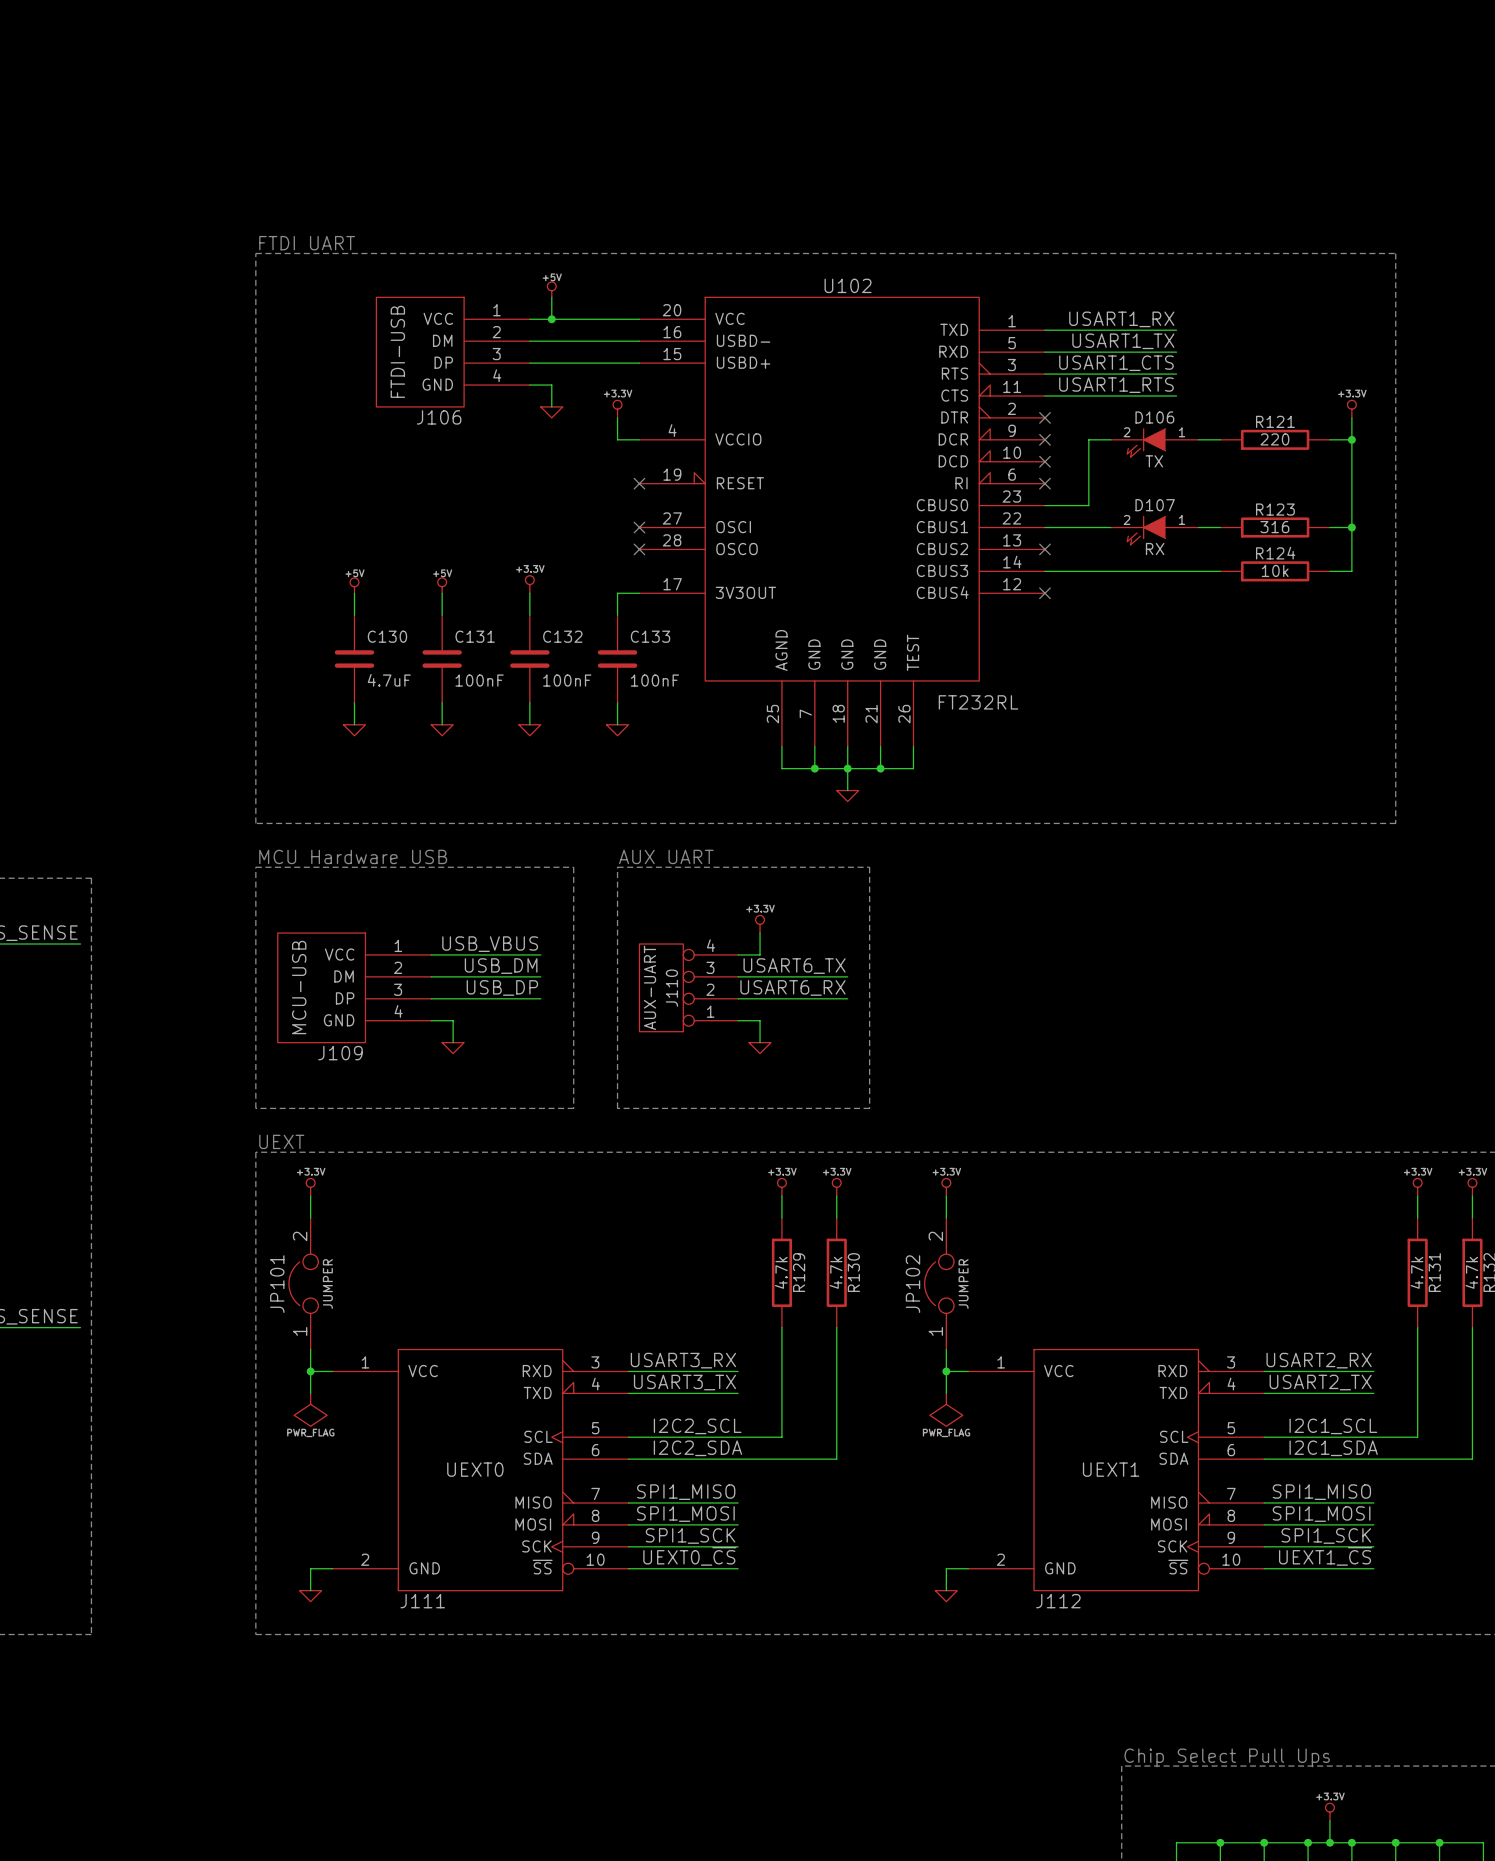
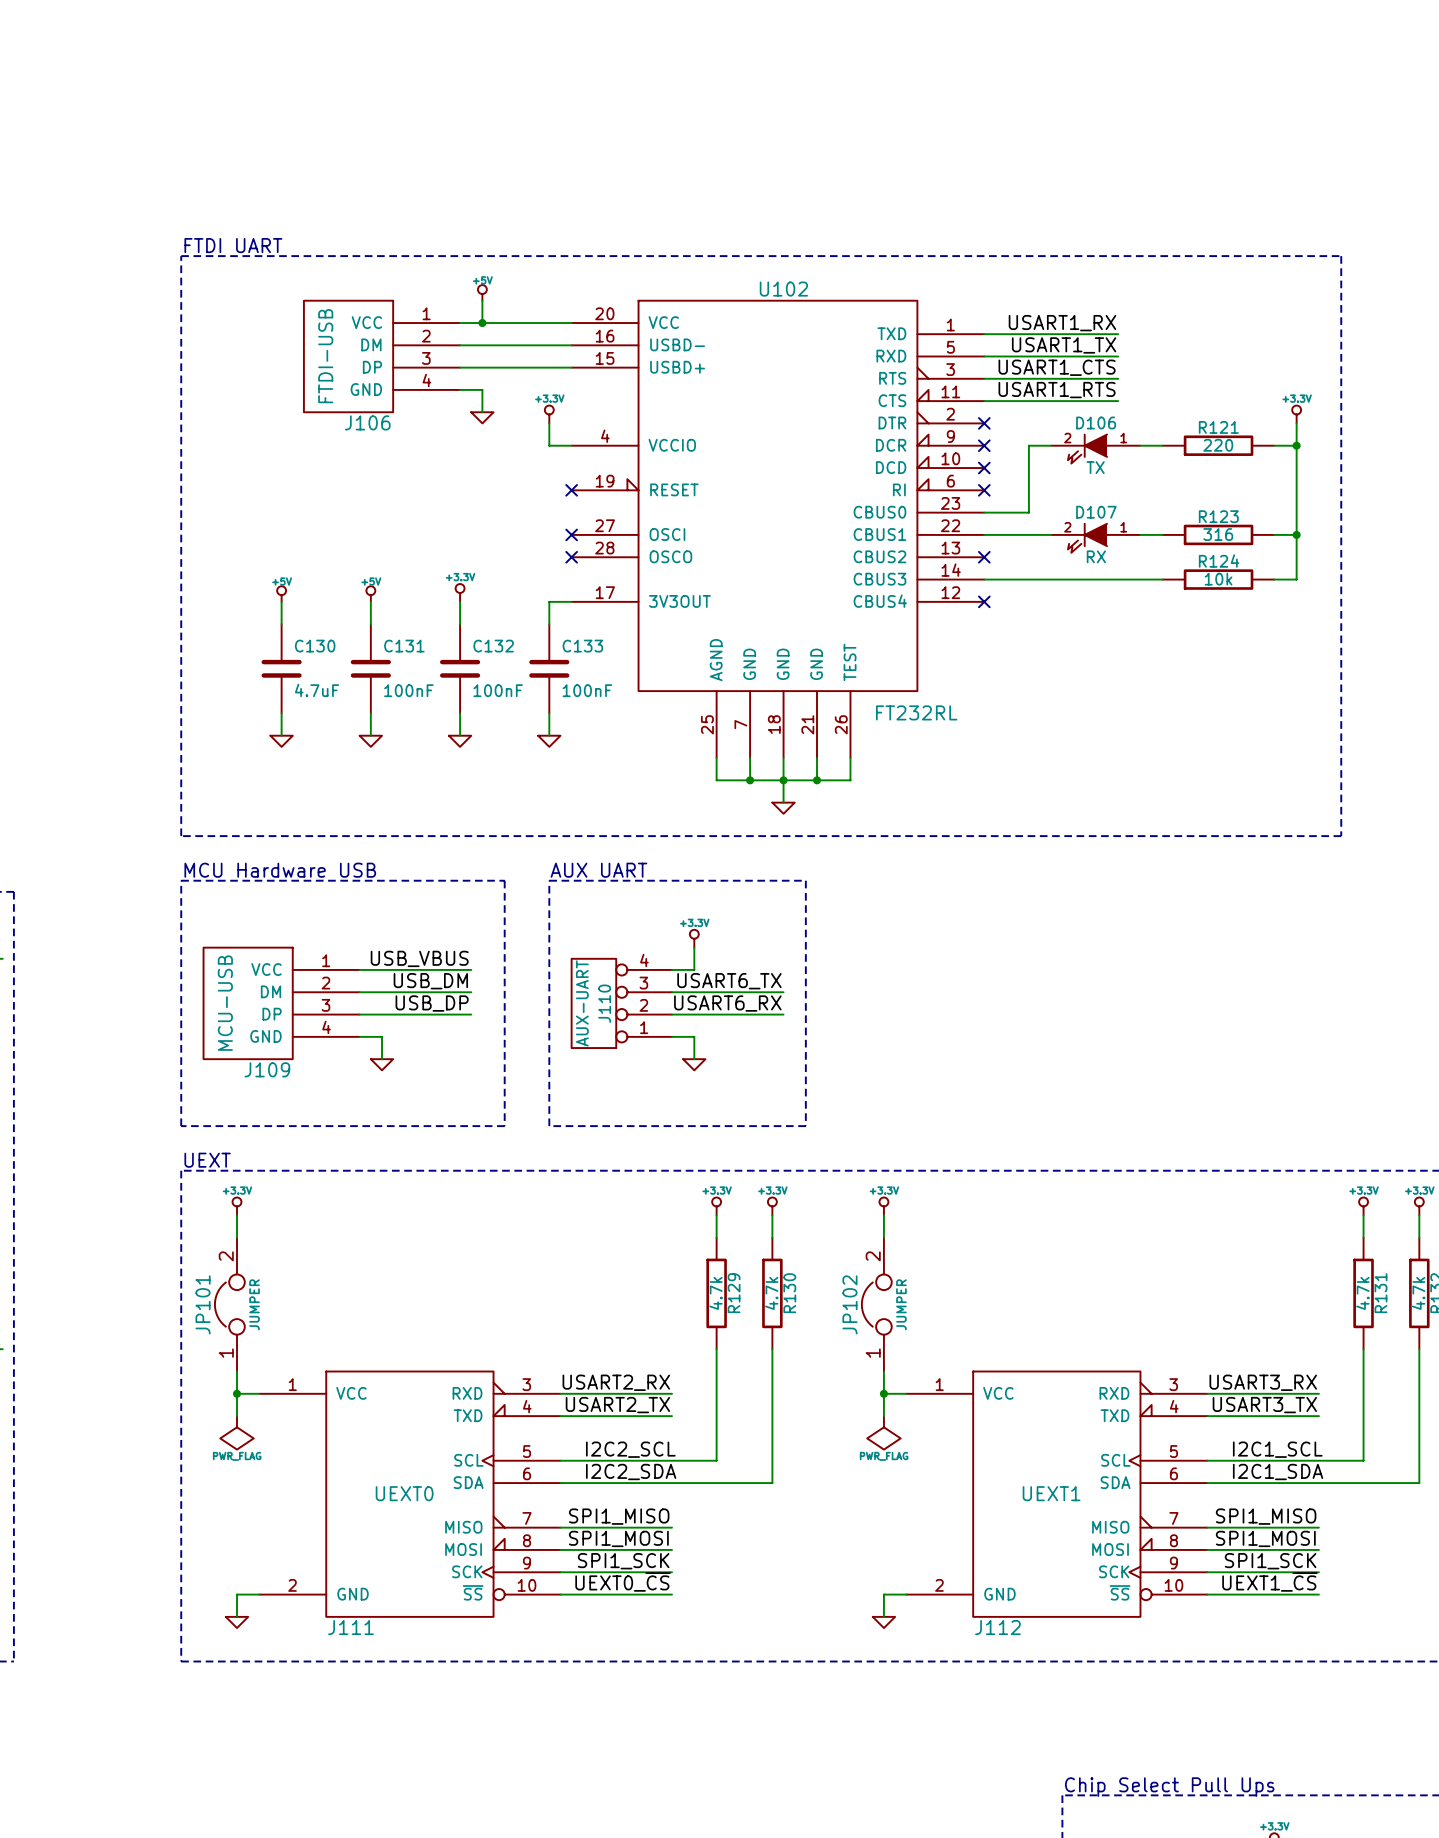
label: USART3_RX (683, 1360) -> USART2_RX (616, 1382)
label: USART2_RX (1319, 1360) -> USART3_RX (1263, 1382)
label: USART3_TX (684, 1382) -> USART2_TX (617, 1405)
label: USART2_TX (1320, 1382) -> USART3_TX (1264, 1405)

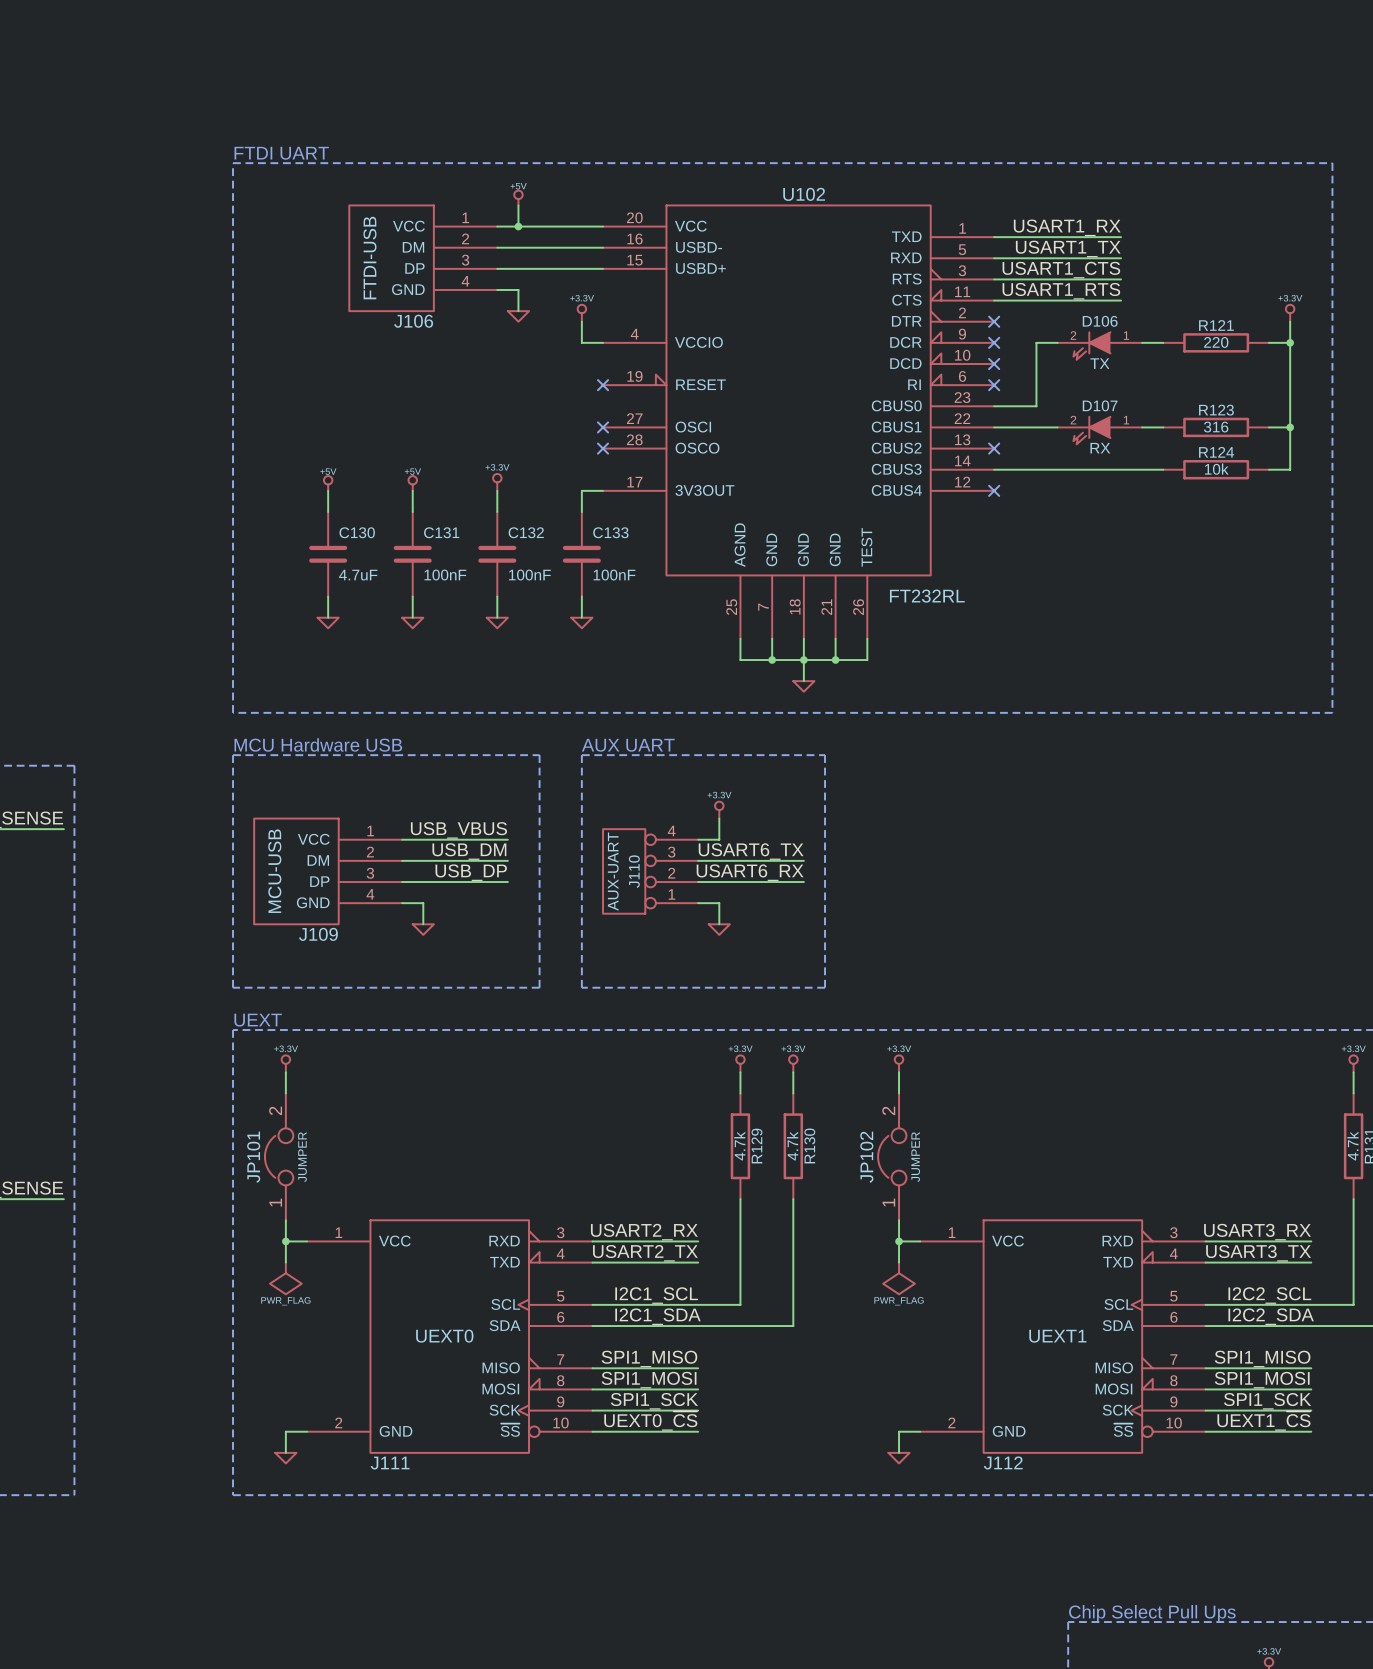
label: I2C2_SCL (630, 1449) -> I2C1_SCL (656, 1295)
label: I2C1_SCL (1277, 1449) -> I2C2_SCL (1269, 1295)
label: I2C2_SDA (631, 1472) -> I2C1_SDA (657, 1316)
label: I2C1_SDA (1278, 1472) -> I2C2_SDA (1271, 1316)

